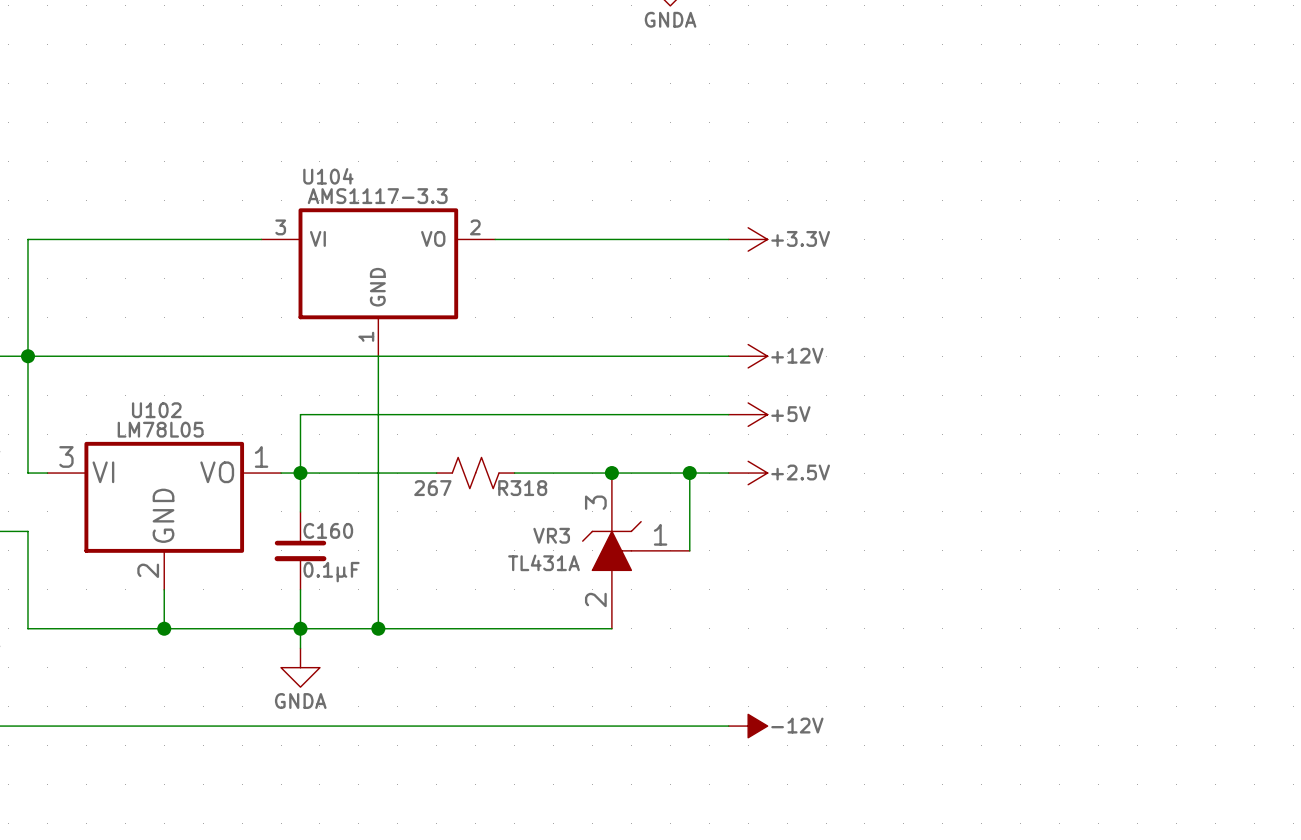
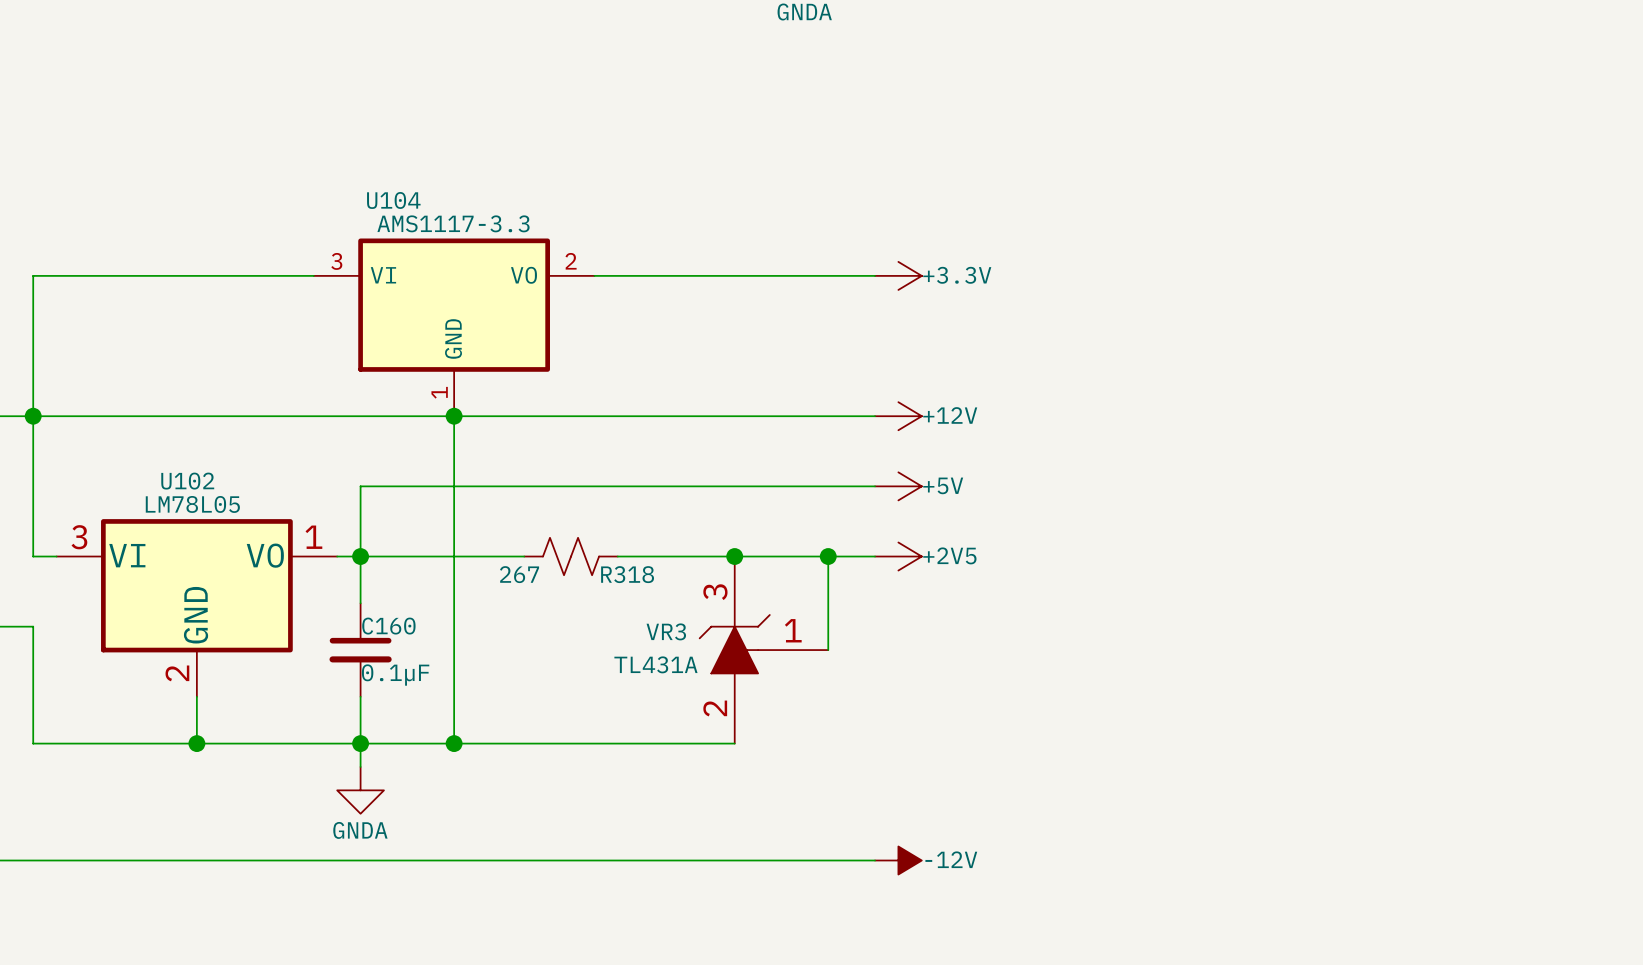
junction: none -> (454, 416)
power symbol: +2.5V (748, 473) -> +2V5 (898, 556)

